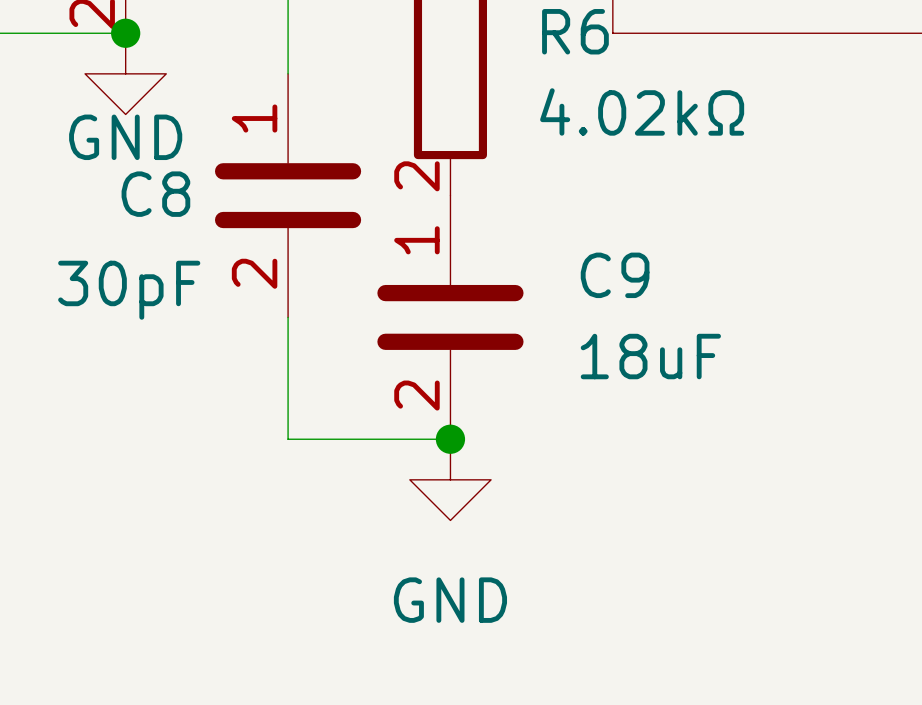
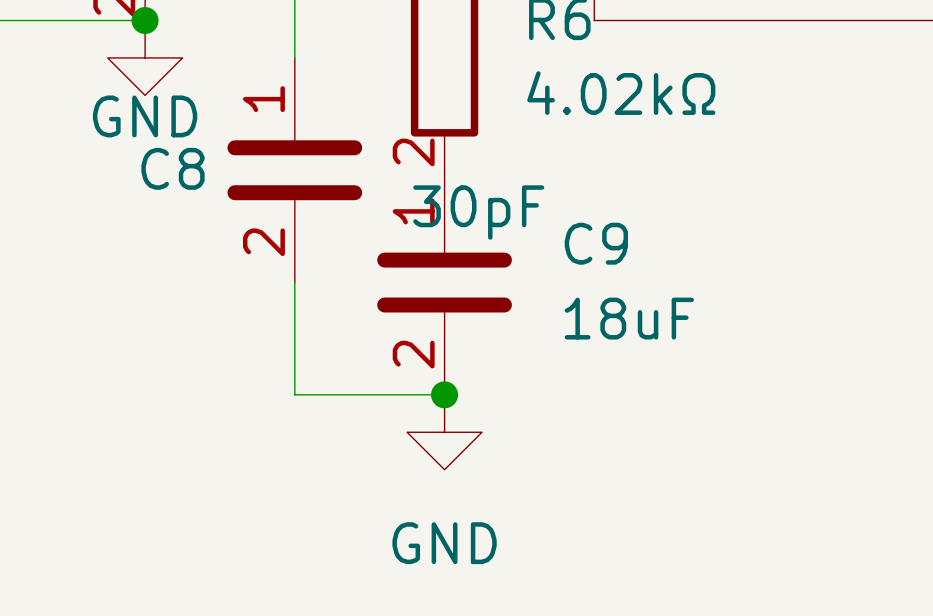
C8 value position: 30pF (129, 290) -> 30pF (478, 212)

